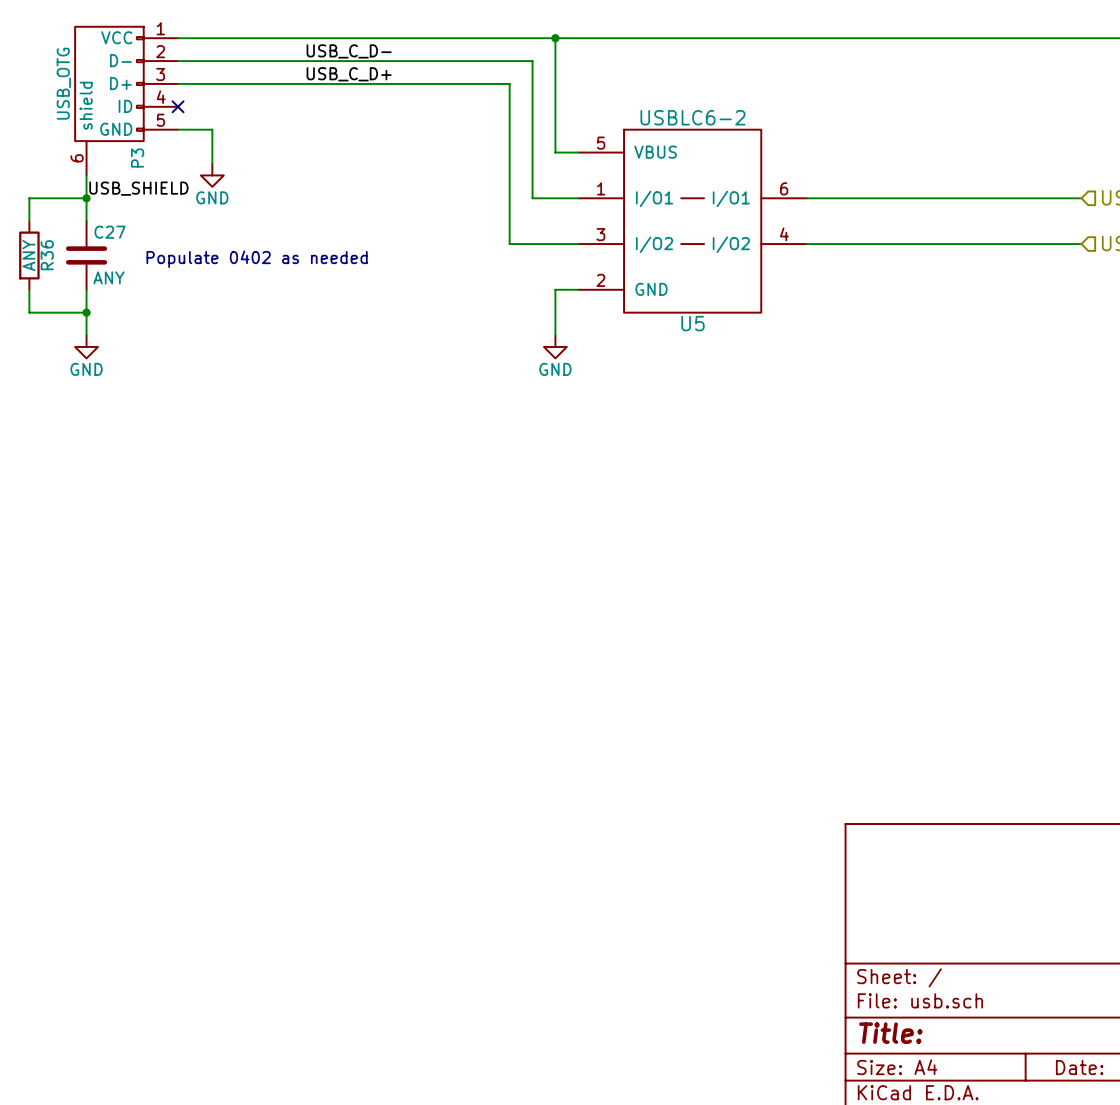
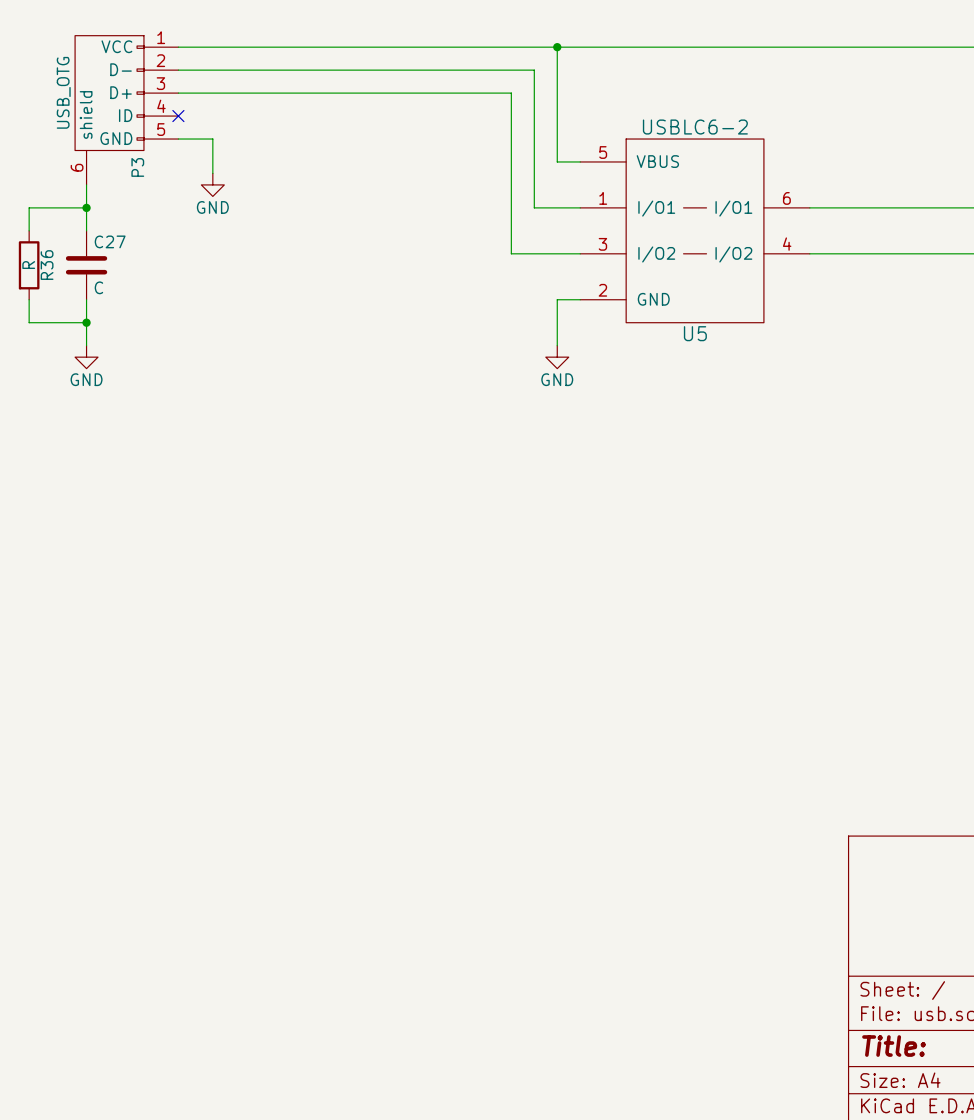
label: USB_C_D- (349, 51) -> none
label: USB_C_D+ (349, 74) -> none
label: USB_SHIELD (138, 188) -> none
R36 value: ANY (28, 255) -> R (28, 265)
text: Populate 0402 as needed (257, 259) -> none
C27 value: ANY (108, 277) -> C (98, 287)

